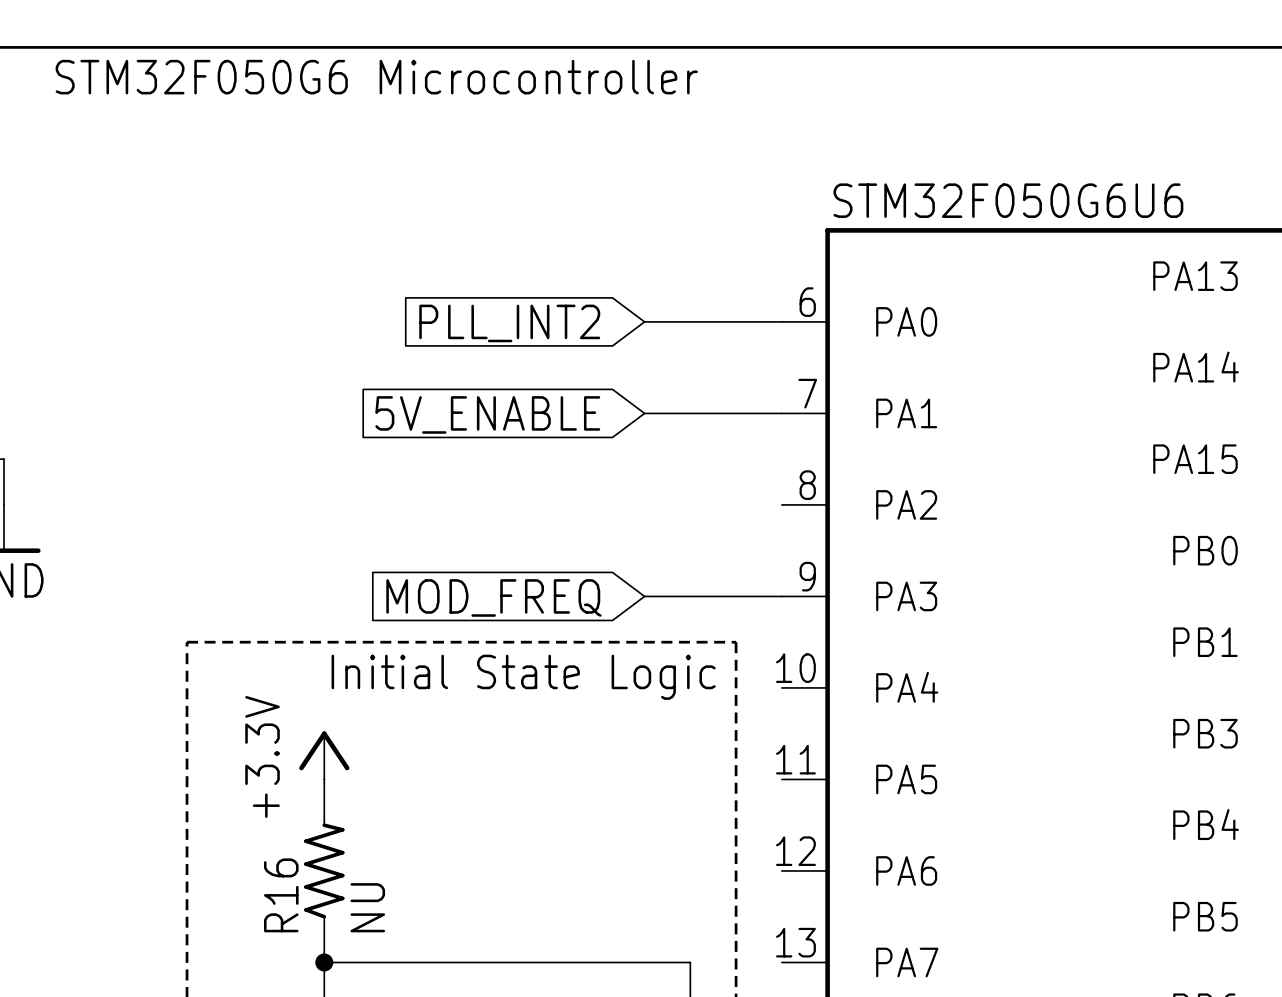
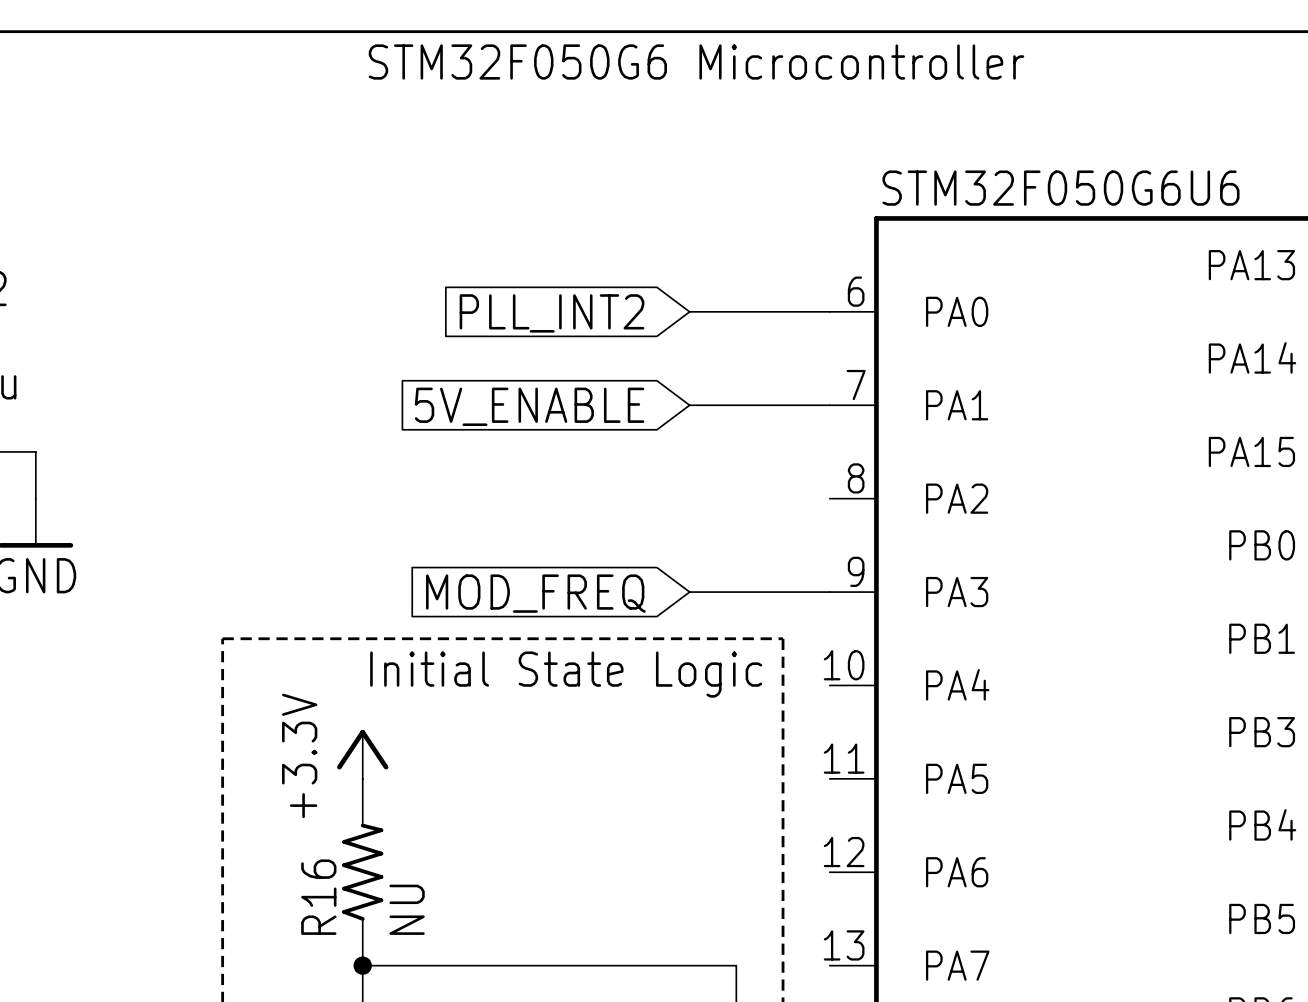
text position: STM32F050G6 Microcontroller (376, 77) -> STM32F050G6 Microcontroller (696, 62)

